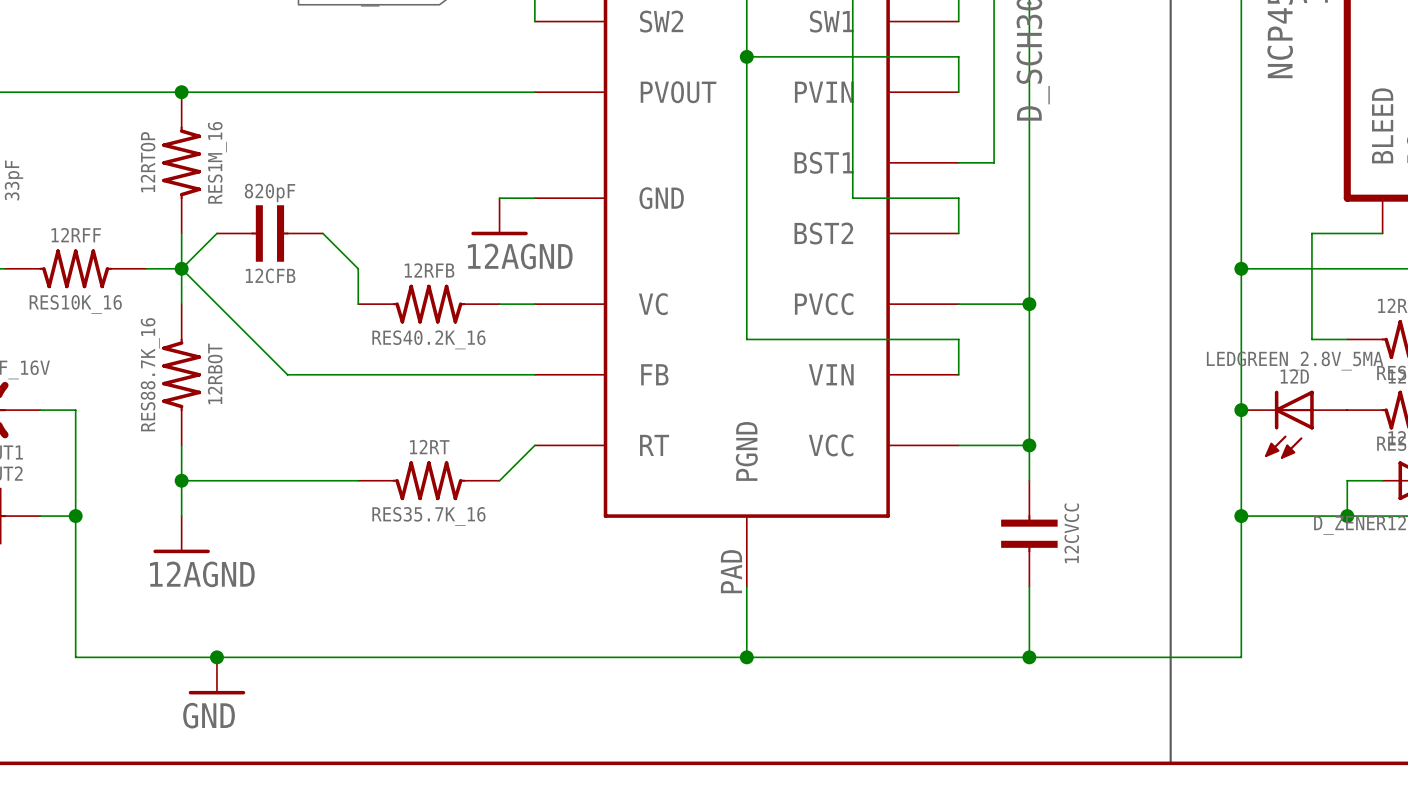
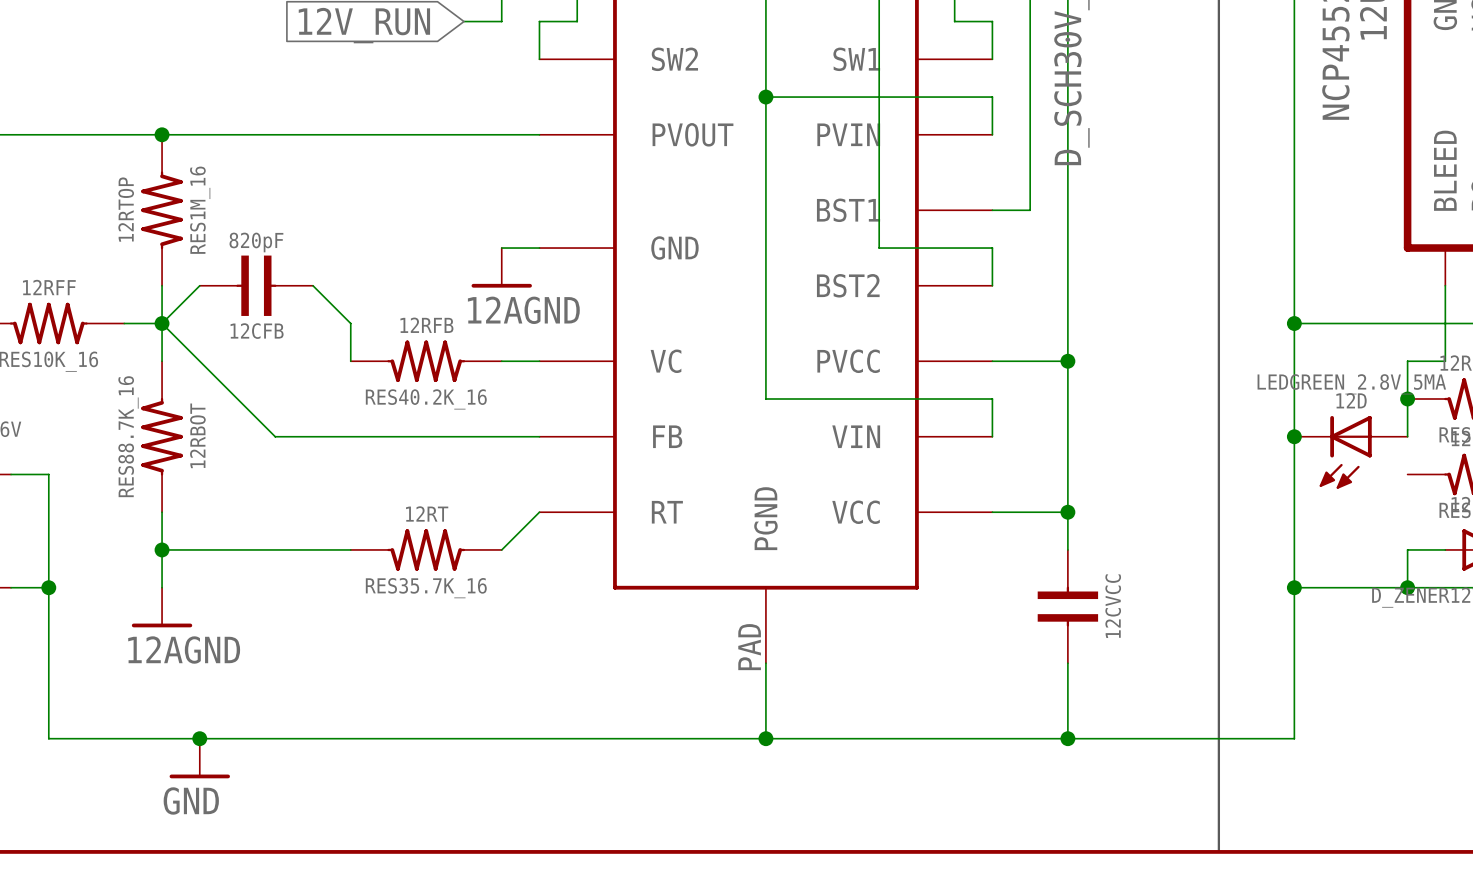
wire: (1382, 233) (1311, 233) (1311, 339) (1347, 339) -> (1445, 285) (1445, 361) (1407, 361) (1407, 436)
junction: none -> (1407, 398)
junction position: (1241, 410) -> (1294, 436)
12D position: (1294, 424) -> (1350, 452)

